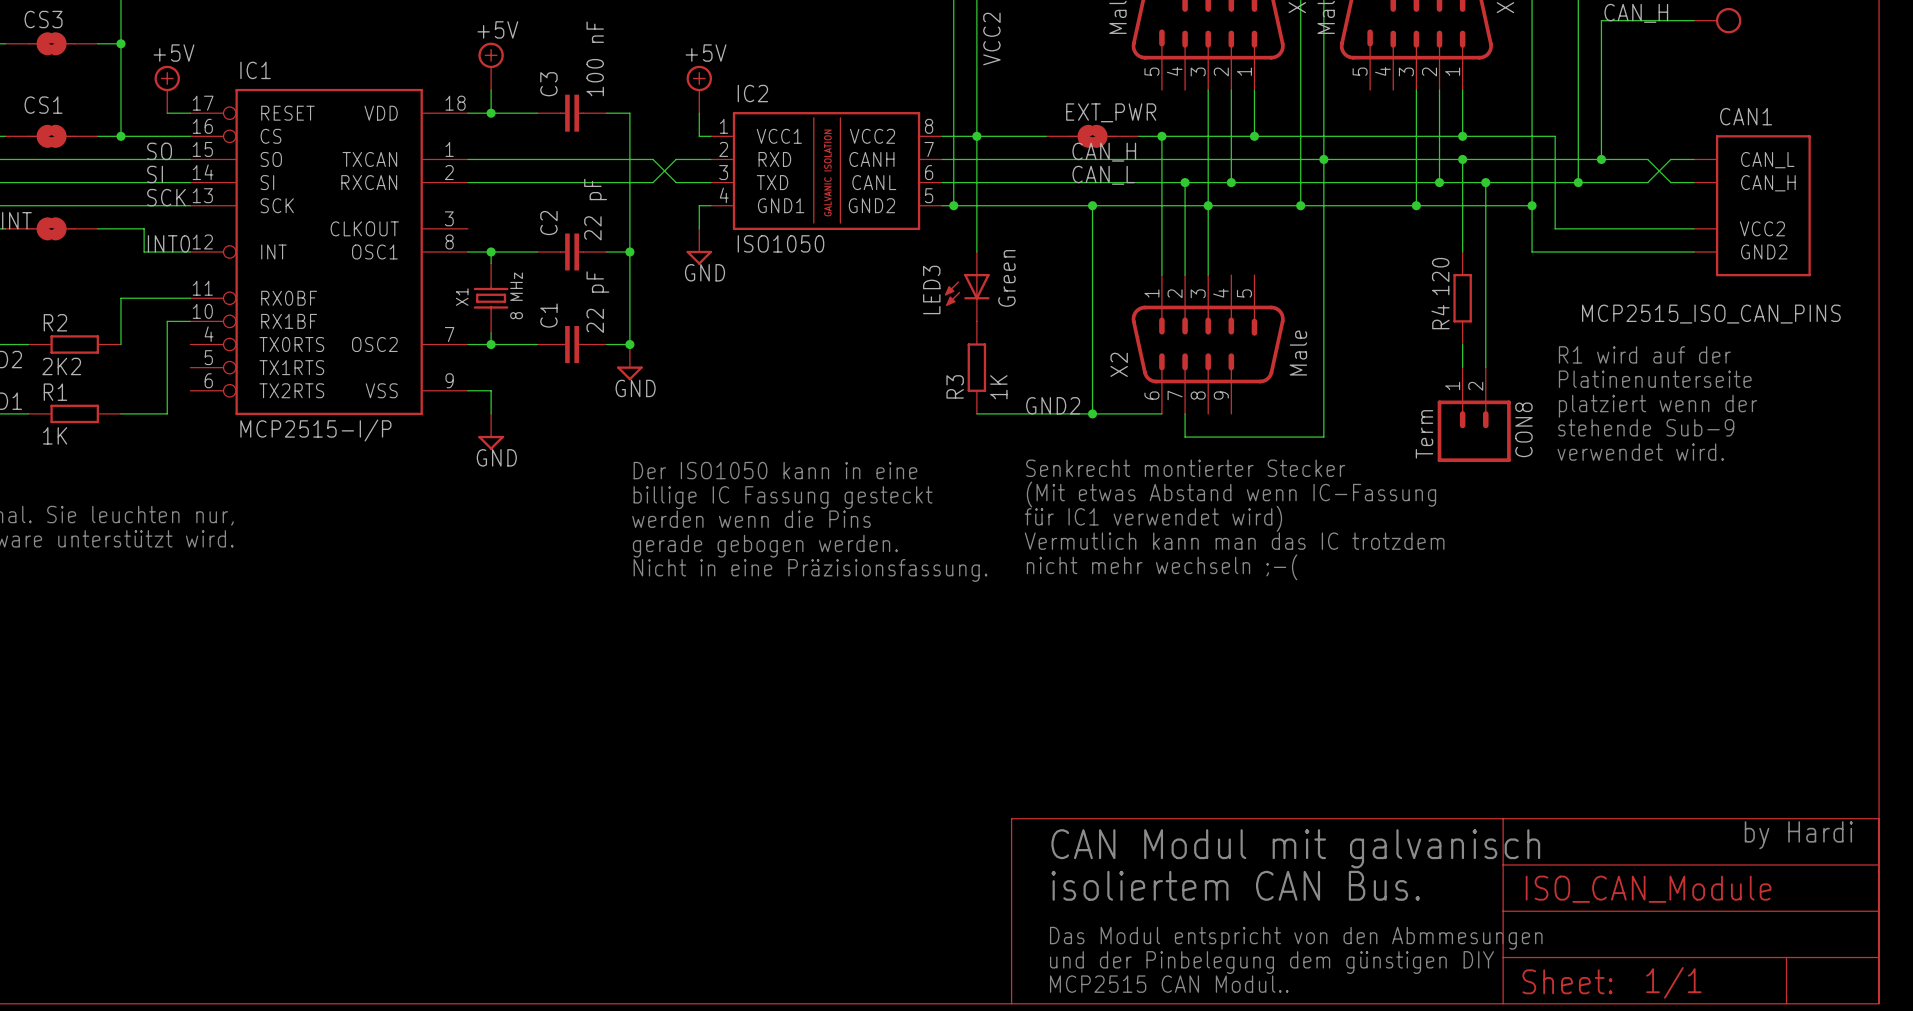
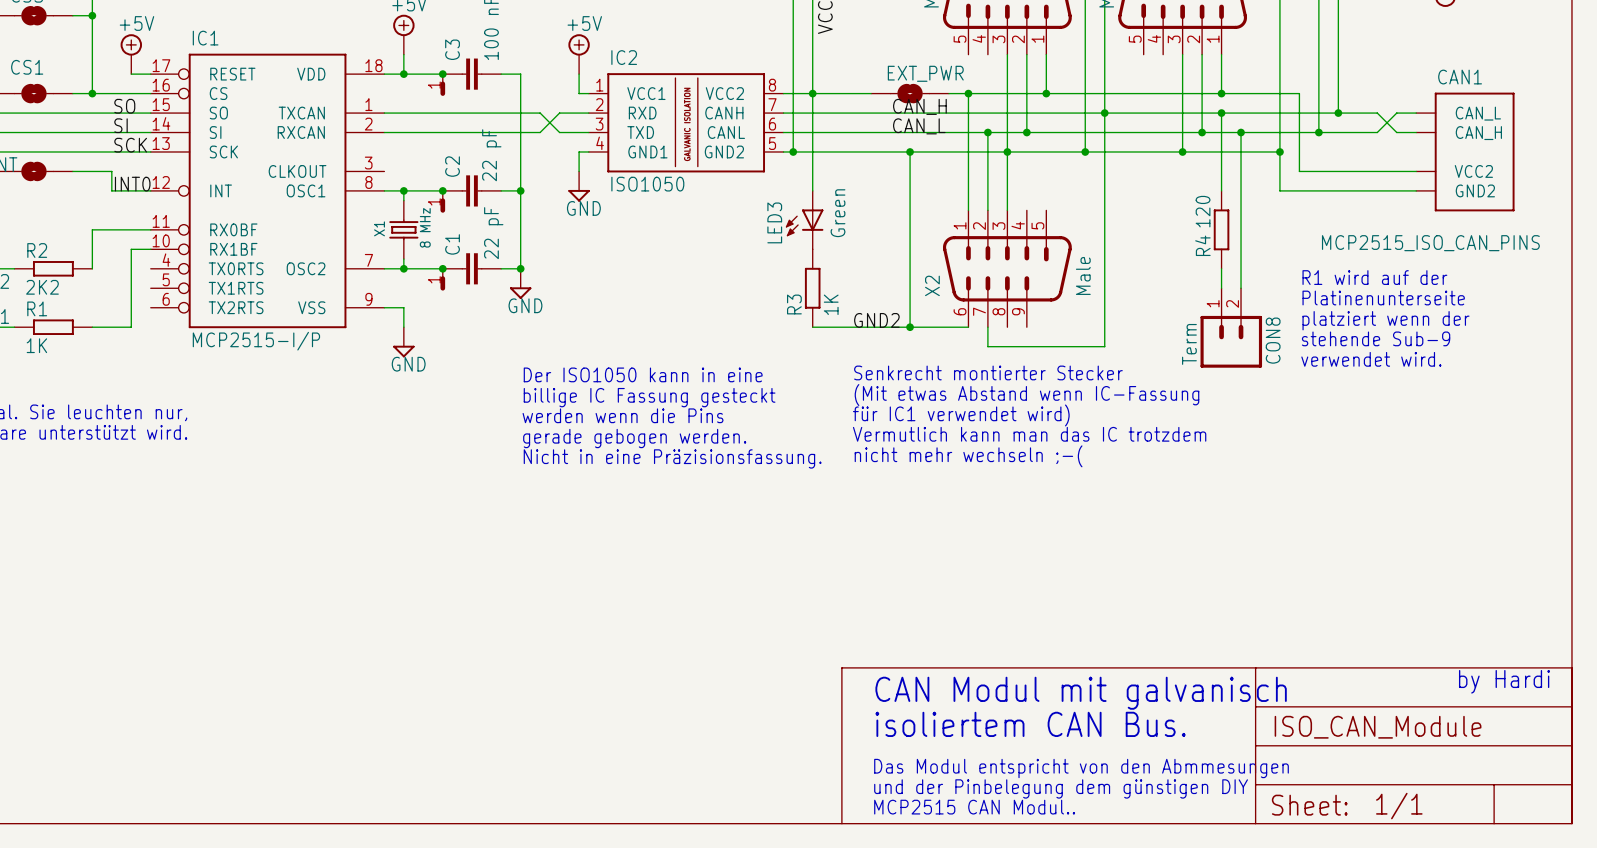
junction: none -> (442, 74)
part: none -> (442, 85)
junction: none -> (442, 190)
part: none -> (442, 201)
junction: none -> (442, 268)
part: none -> (442, 279)

